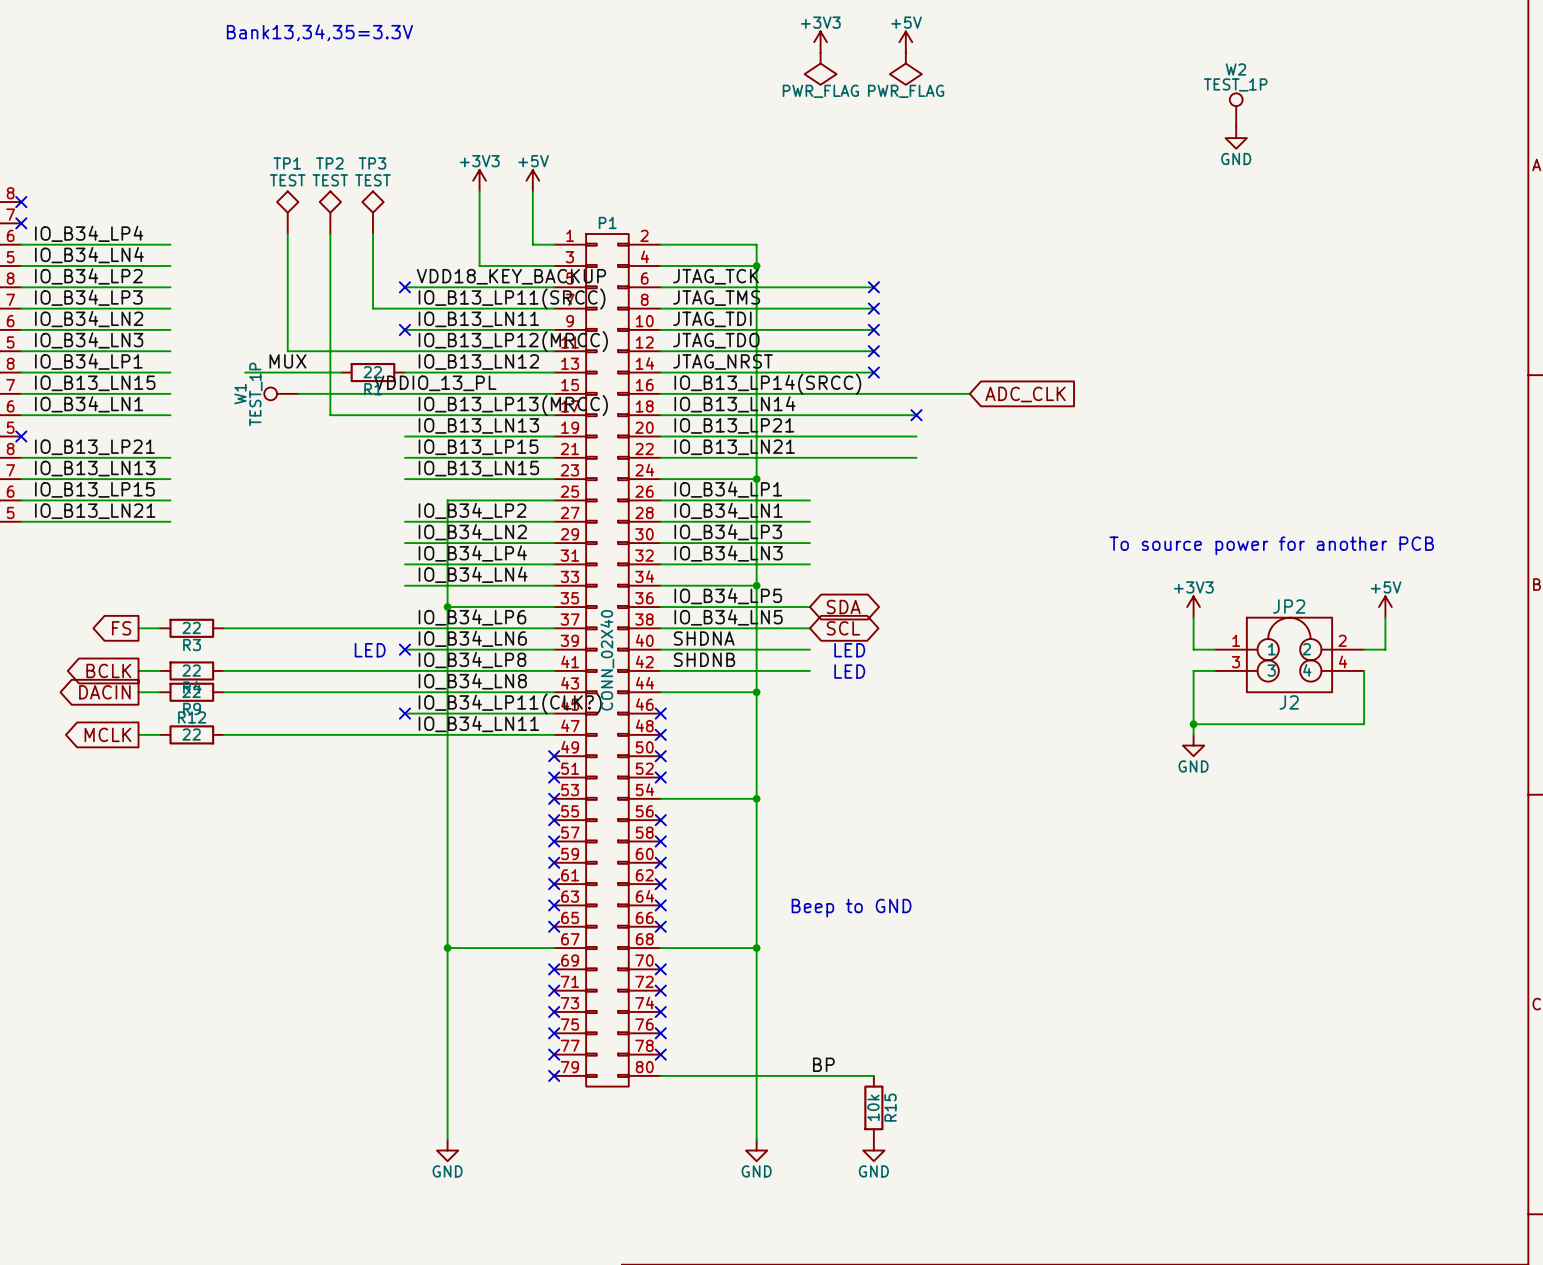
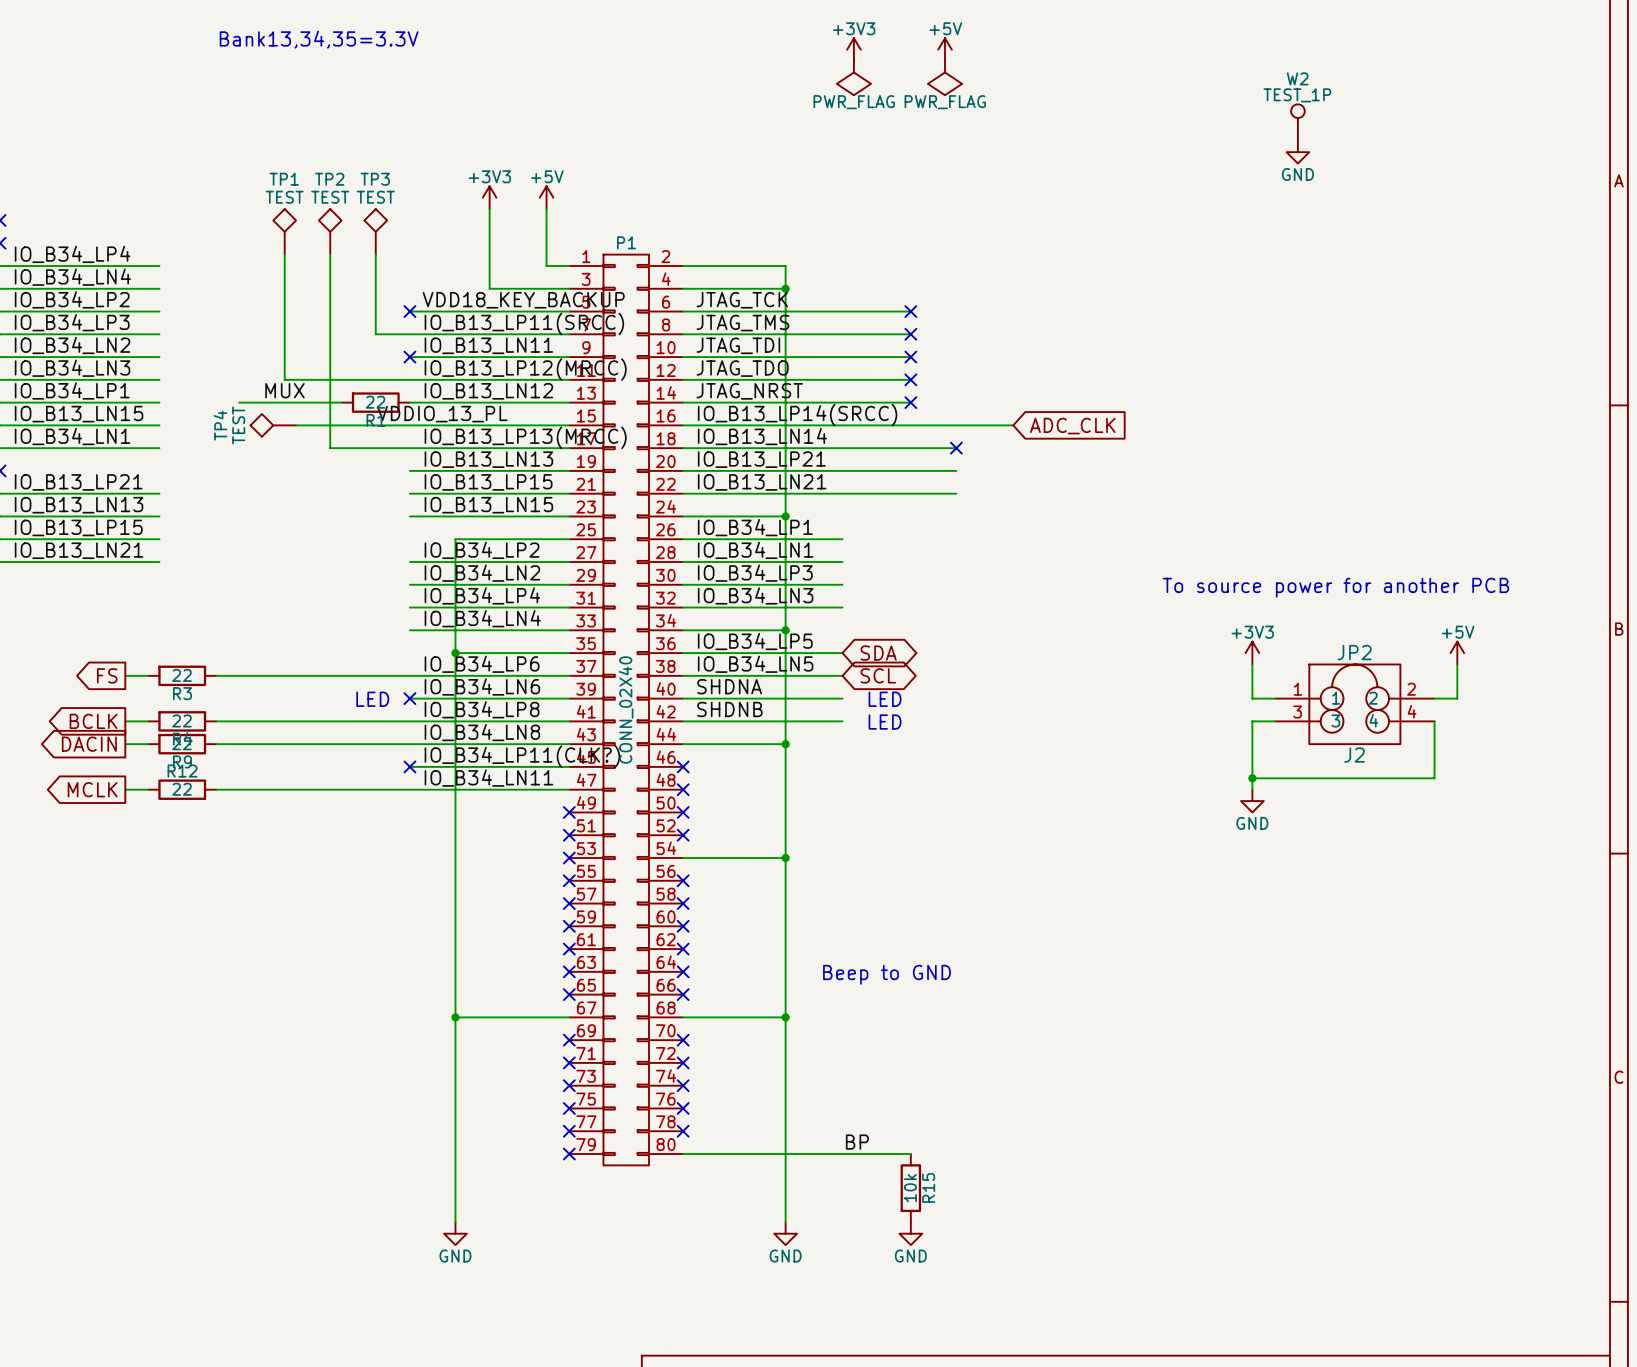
TP4: none -> TEST (273, 425)
W1: TEST_1P (281, 393) -> none

